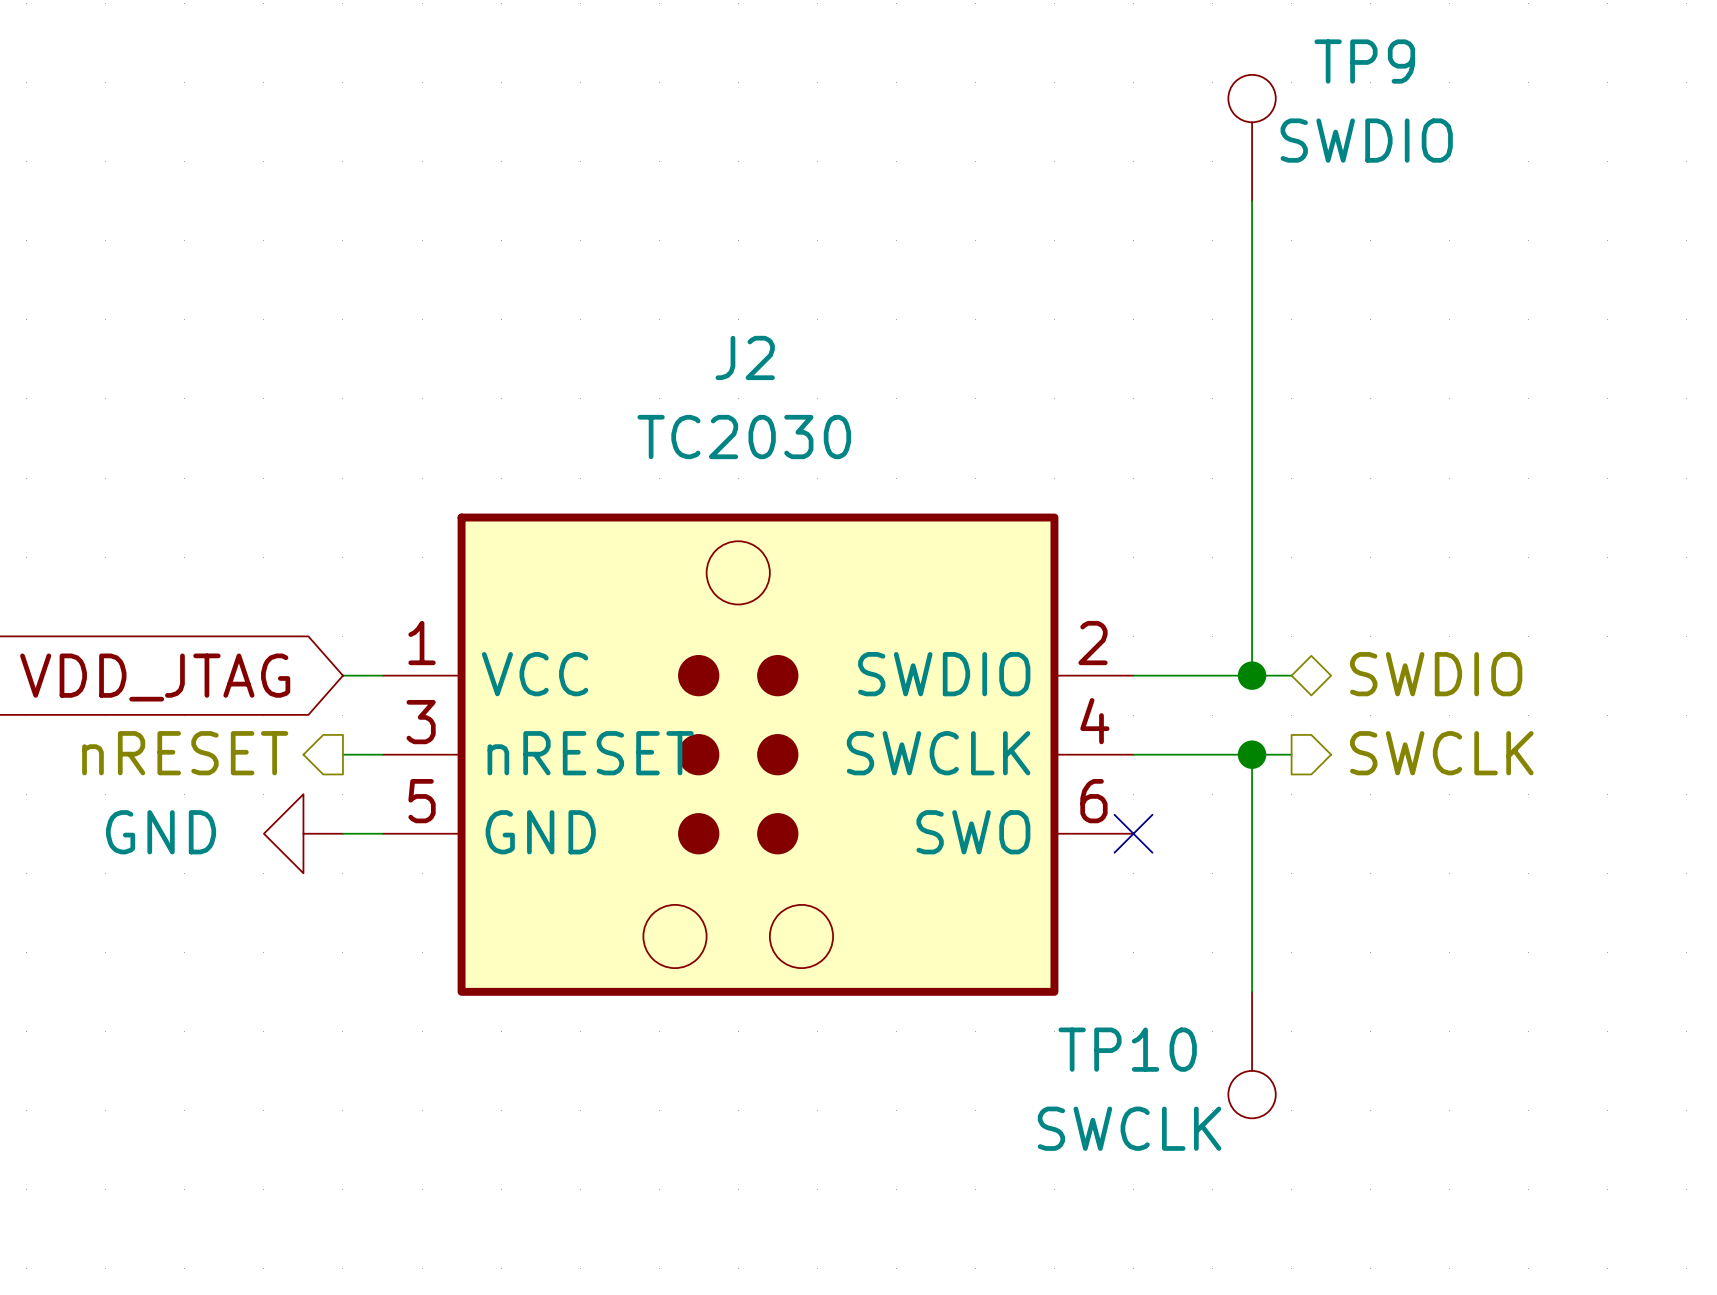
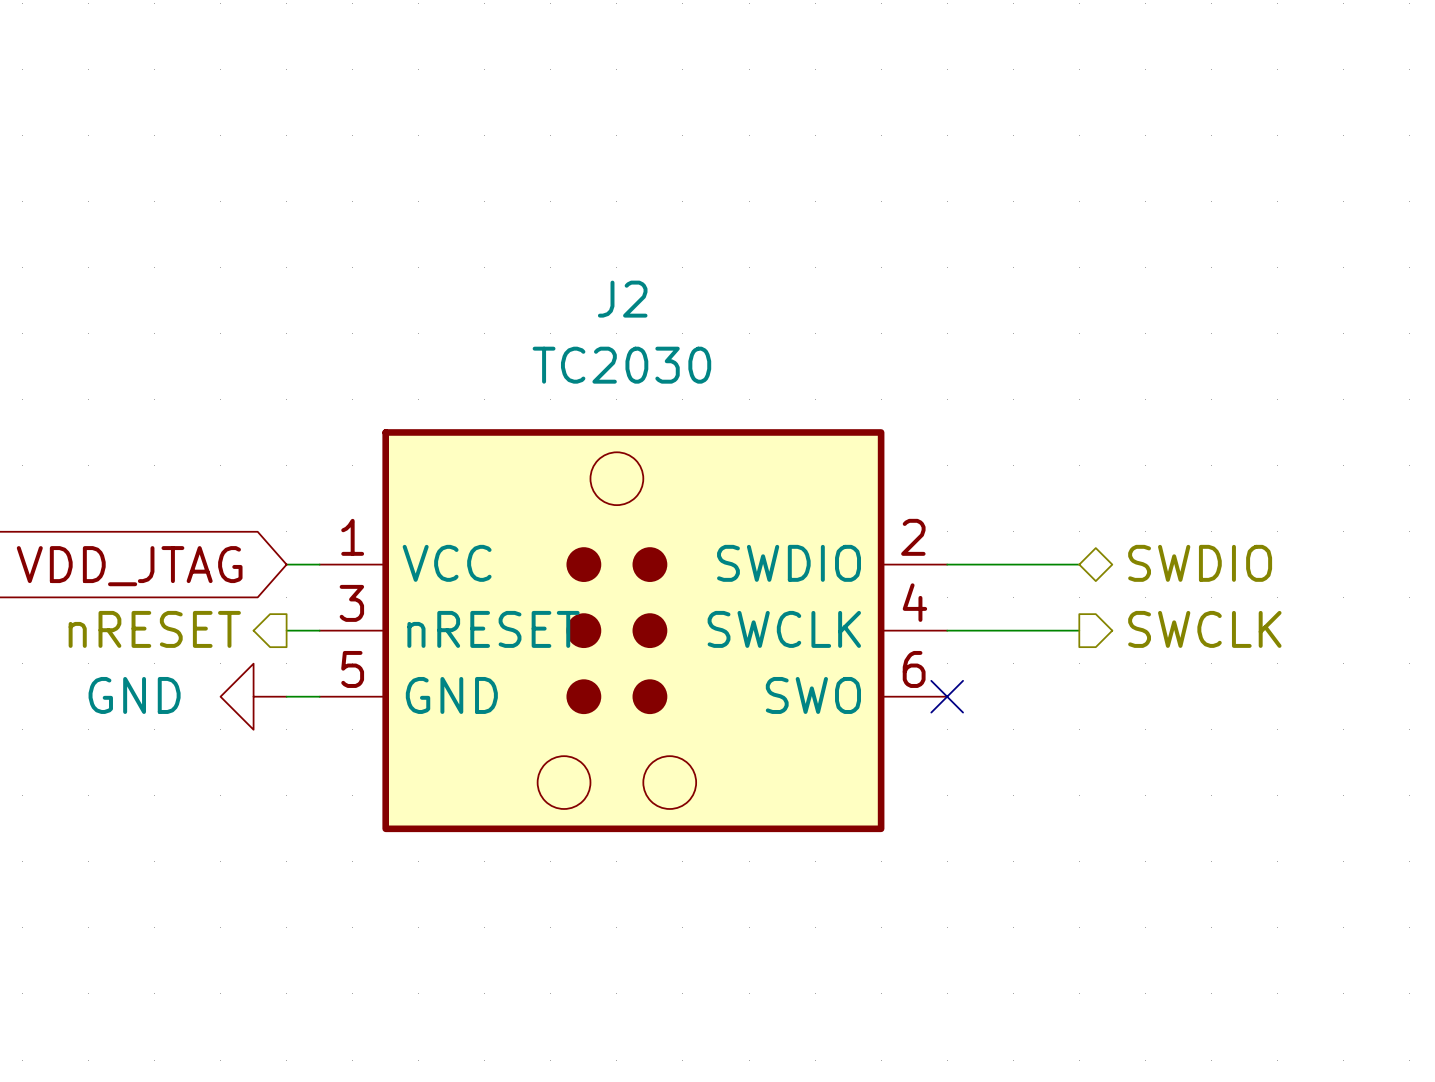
TP9: SWDIO (1252, 138) -> none
wire: (1252, 201) (1252, 675) -> none
junction: (1252, 675) -> none
wire: (1252, 754) (1252, 991) -> none
junction: (1252, 754) -> none
TP10: SWCLK (1252, 1055) -> none

